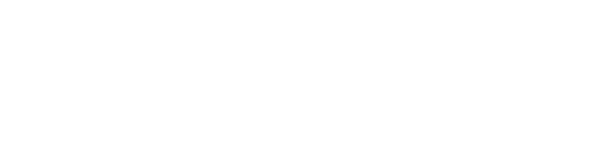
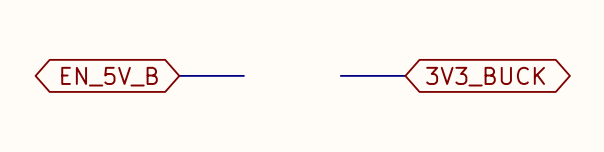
wire: none -> (179, 75) (243, 75)
wire: none -> (340, 75) (405, 75)
global label: none -> EN_5V_B (109, 76)
global label: none -> 3V3_BUCK (485, 76)

